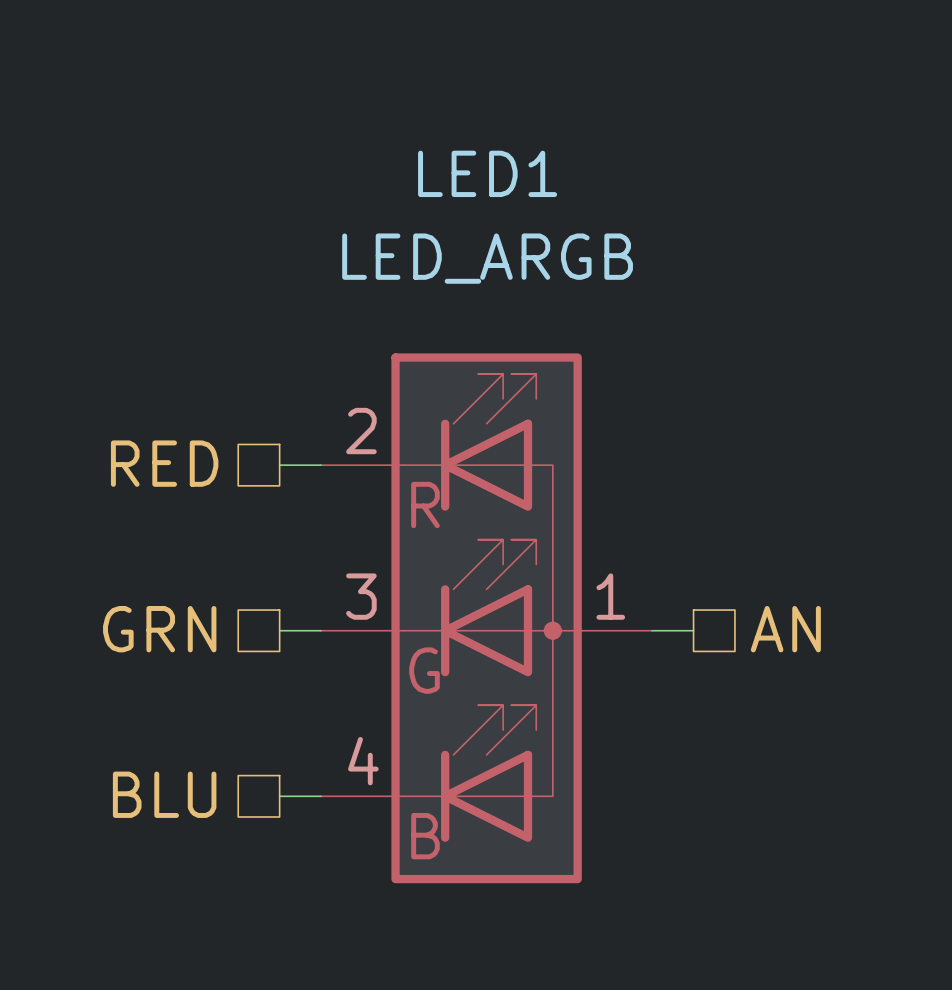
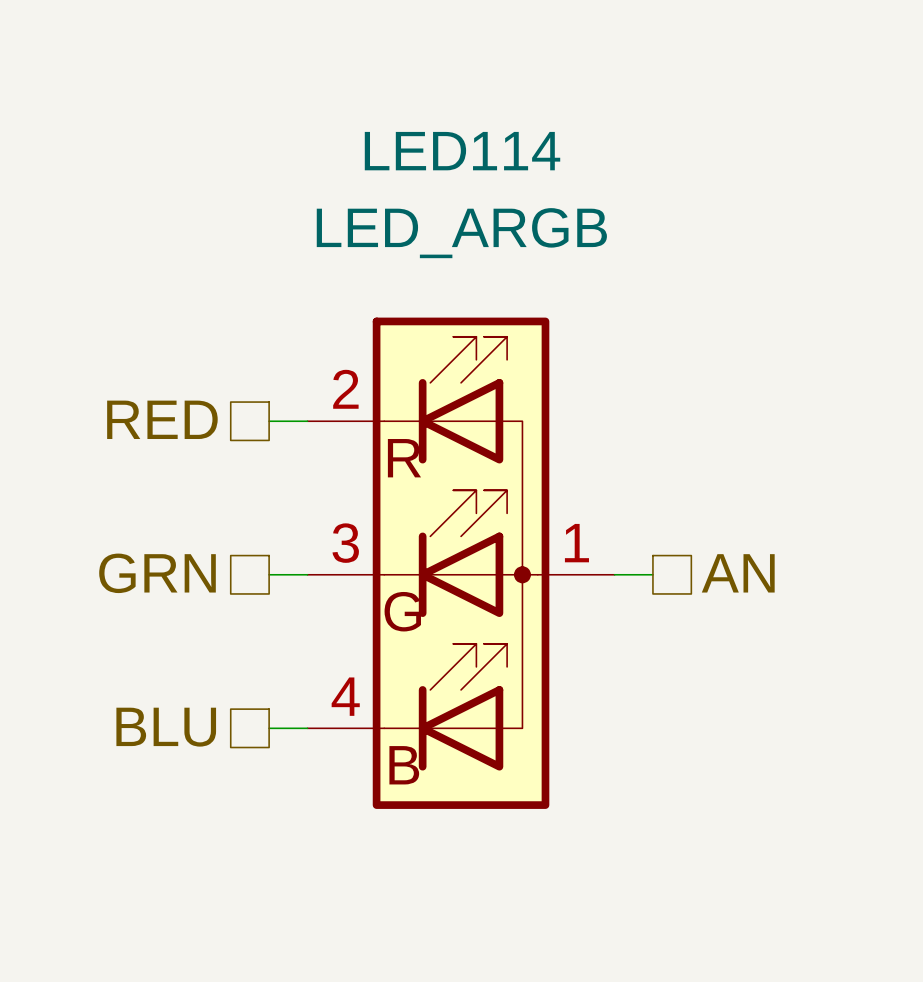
LED1 name: LED1 (487, 173) -> LED114 (462, 151)

